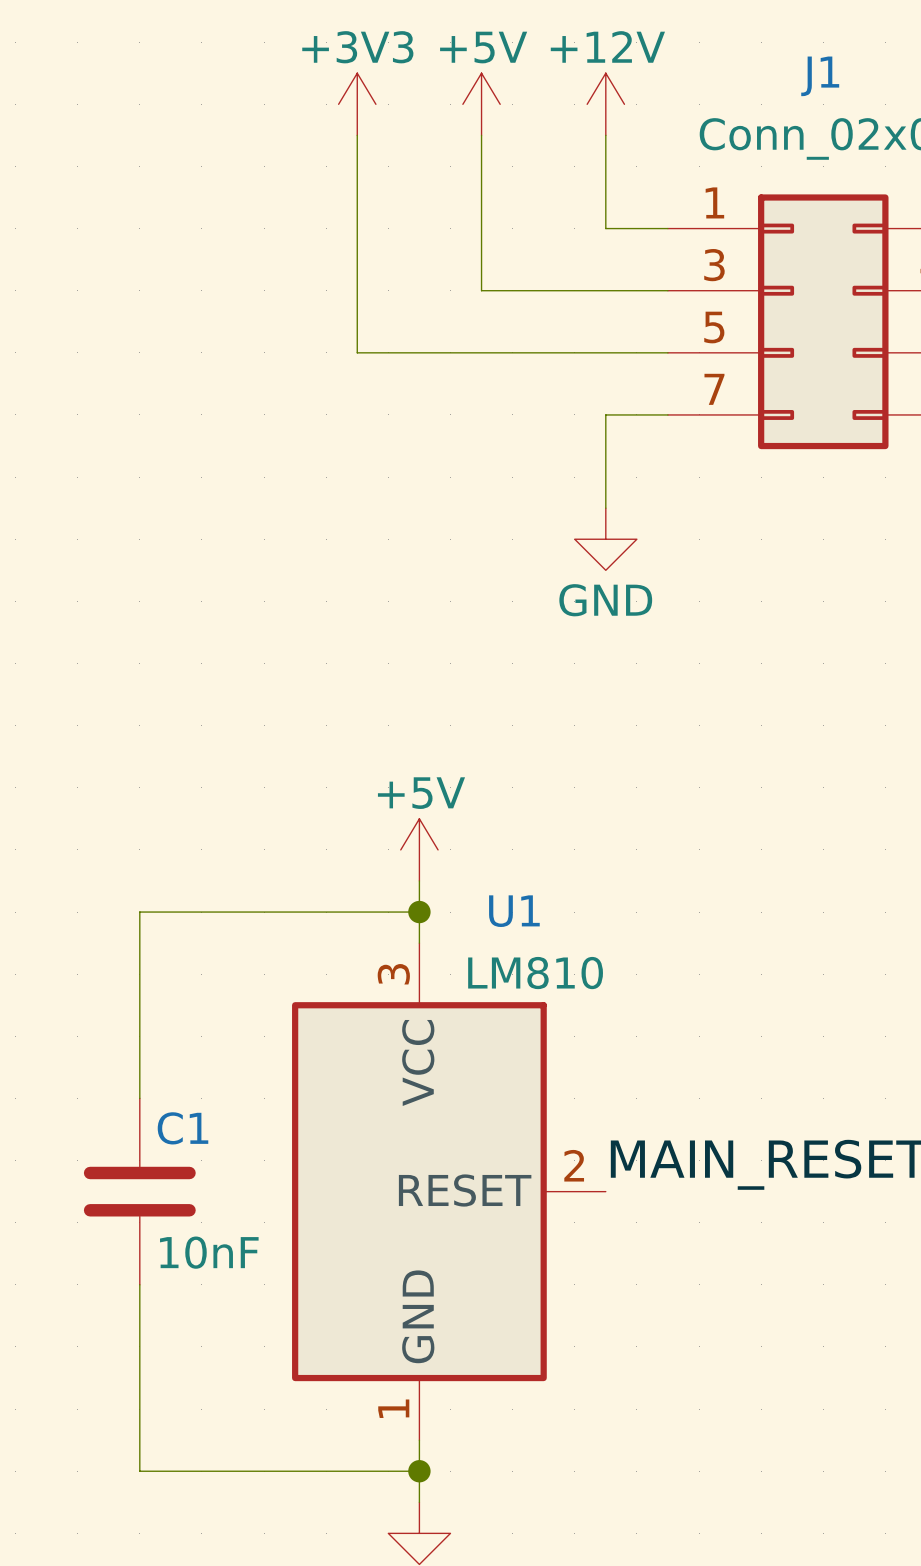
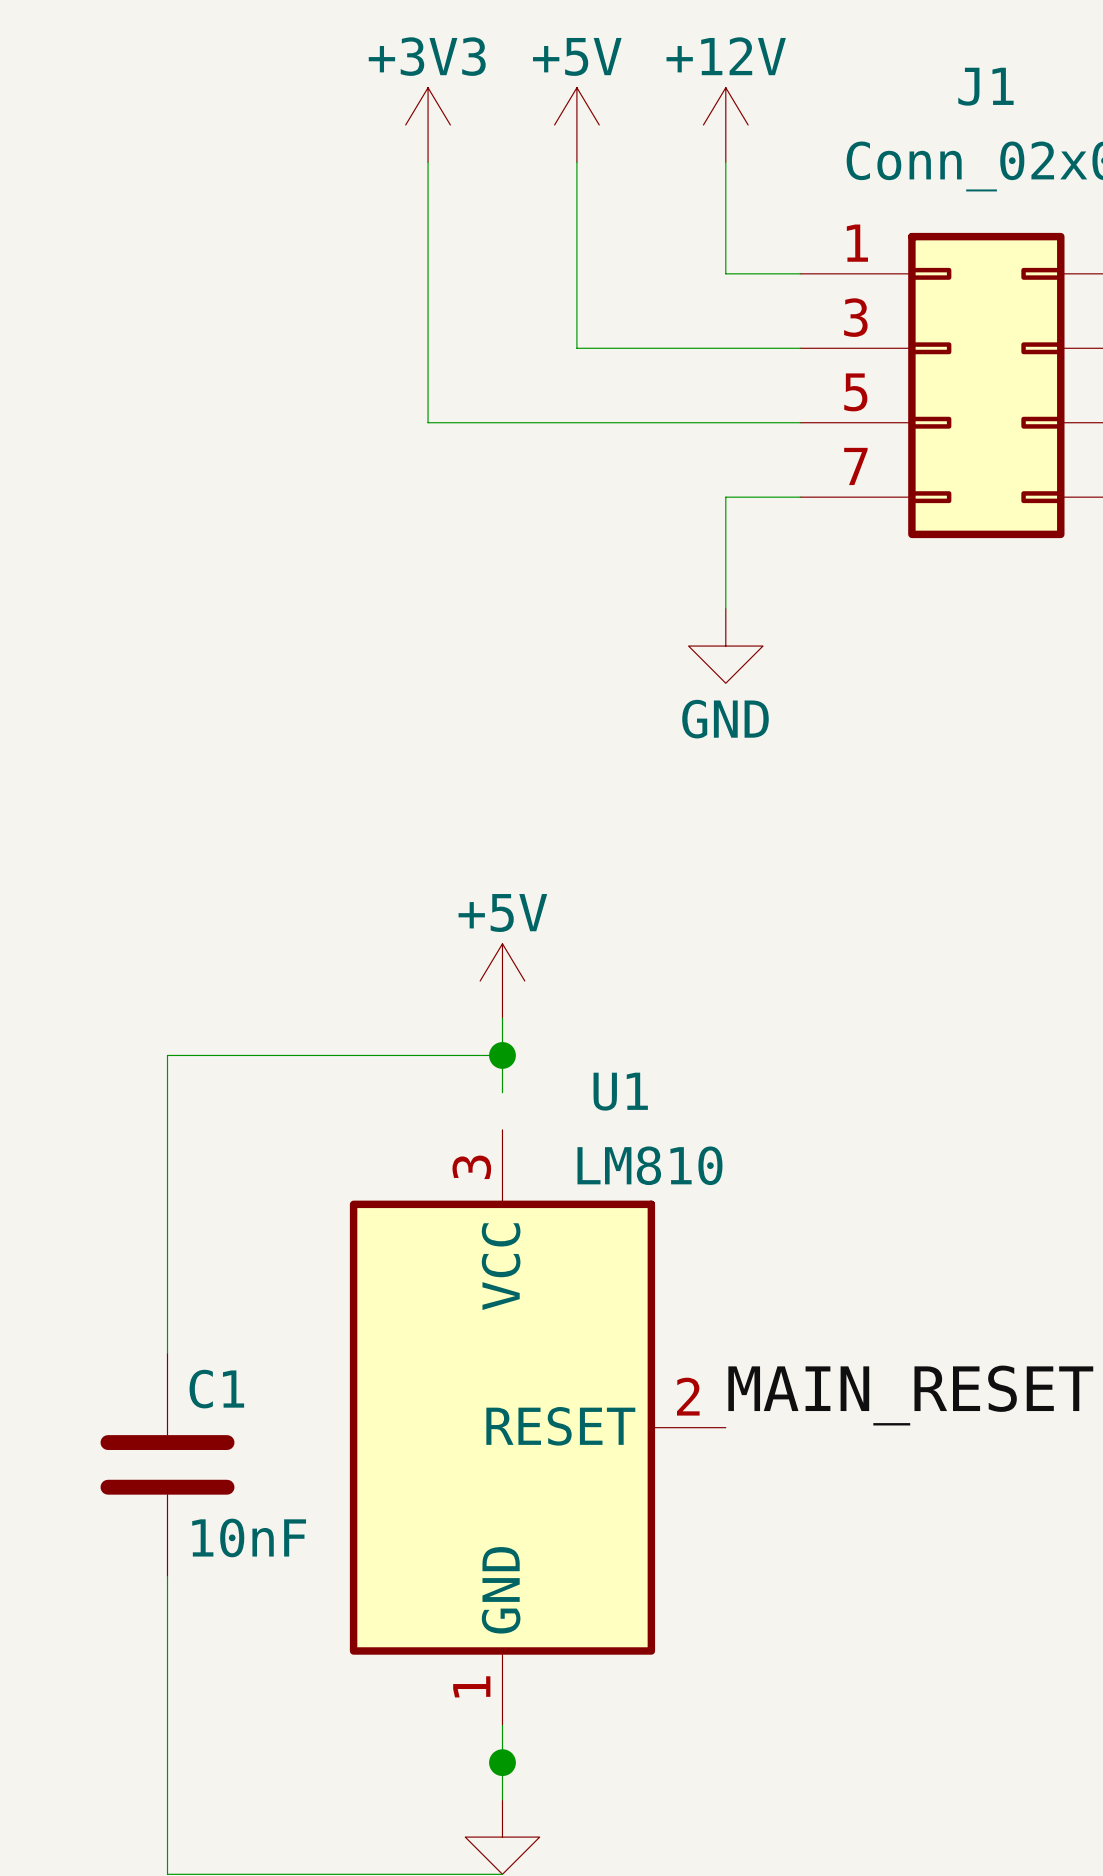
power symbol position: +5V (419, 849) -> +5V (502, 981)
wire: (139, 912) (419, 912) (419, 943) -> (167, 1092) (167, 1055) (502, 1055) (502, 1018)
junction position: (419, 912) -> (502, 1055)
C1 position: (139, 1191) -> (167, 1464)
wire: (139, 1471) (419, 1471) -> (167, 1762) (167, 1874) (502, 1874)

